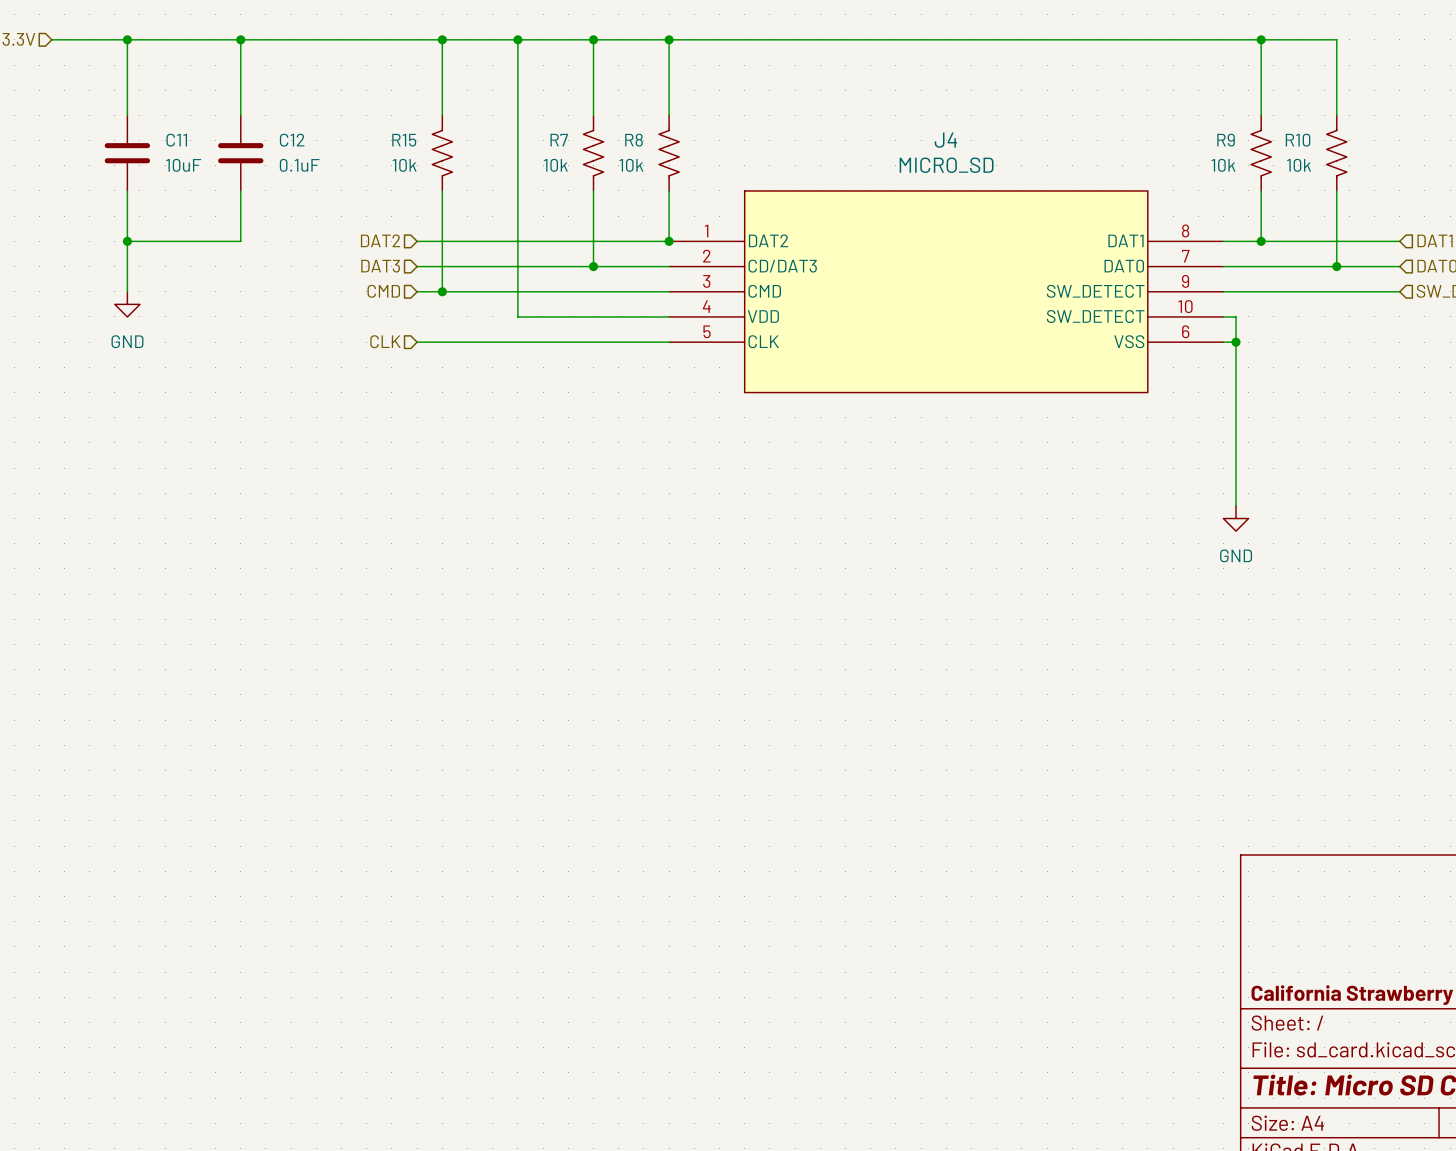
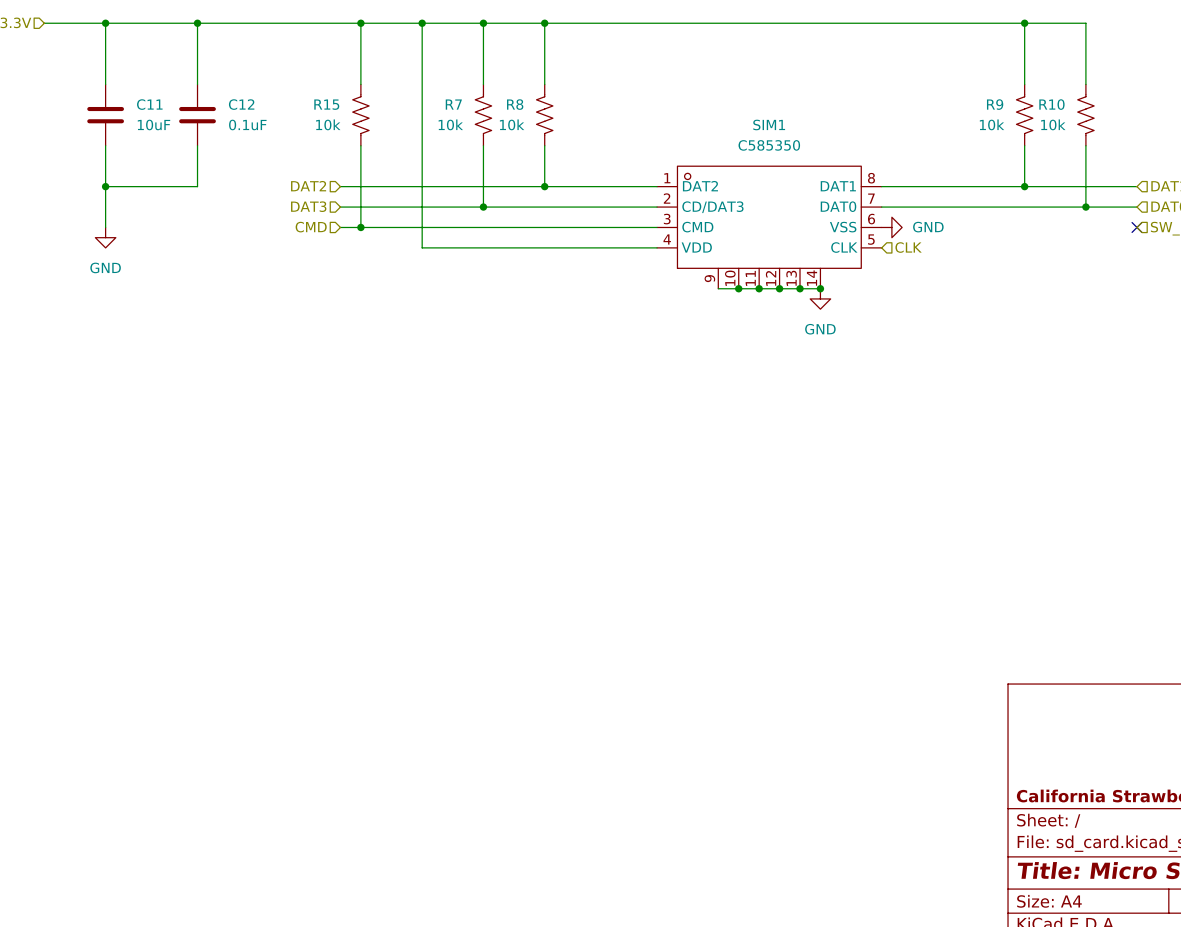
J4: MICRO_SD (946, 291) -> none
SIM1: none -> C585350 (769, 227)
power symbol: none -> GND (891, 227)
wire: (1223, 291) (1399, 291) -> none
no-connect mark: none -> (1136, 227)
hierarchical label: none -> CLK (908, 247)
wire: (1223, 316) (1235, 316) (1235, 505) -> none
hierarchical label: CLK (385, 341) -> none
wire: (417, 342) (669, 342) -> none
wire: (1223, 342) (1235, 342) -> none
junction: (1235, 342) -> none
junction: none -> (738, 288)
junction: none -> (759, 288)
junction: none -> (779, 288)
junction: none -> (800, 288)
junction: none -> (820, 288)
power symbol: none -> GND (820, 298)
power symbol: GND (1235, 518) -> none

